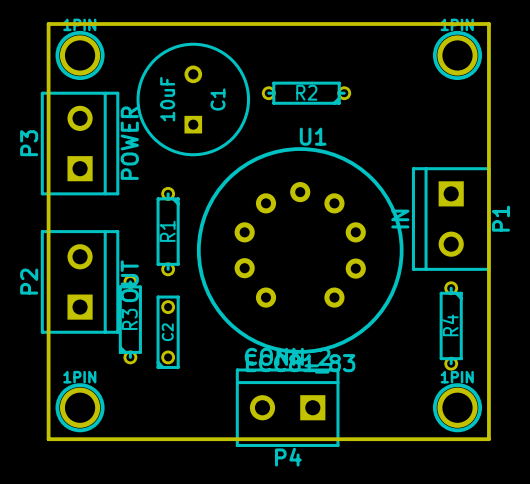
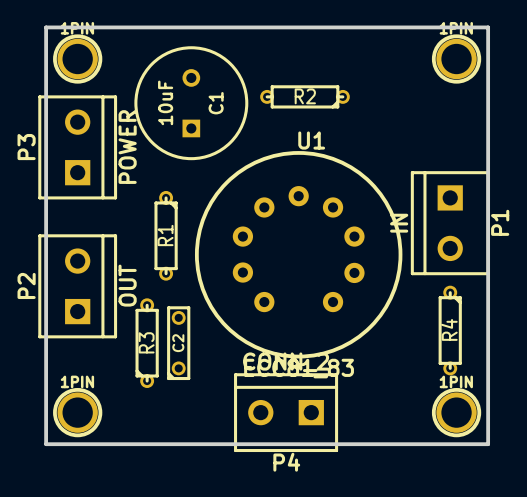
R3 position: (130, 319) -> (147, 343)
C2 position: (168, 332) -> (178, 343)

